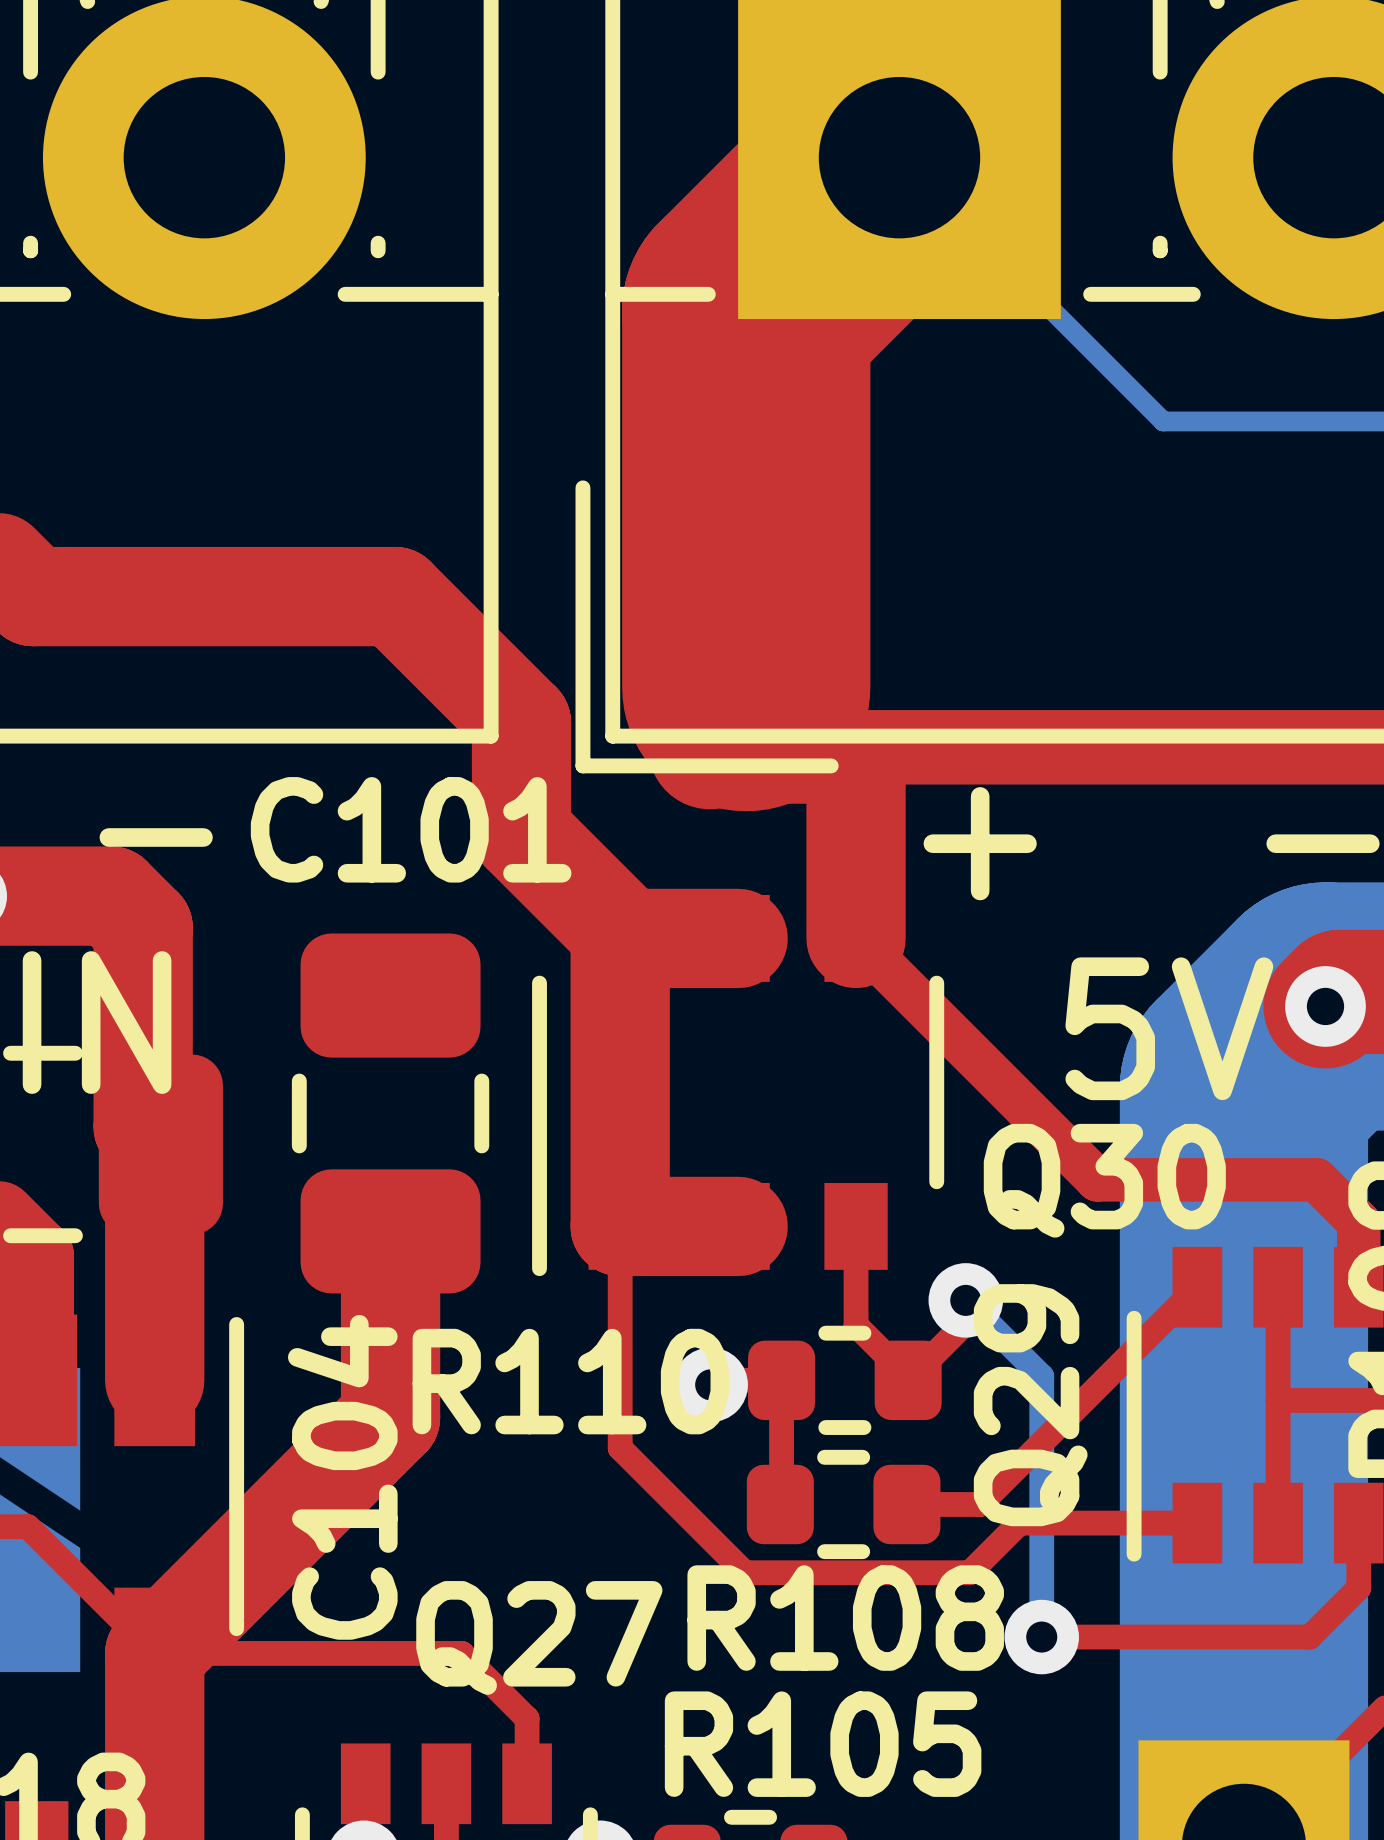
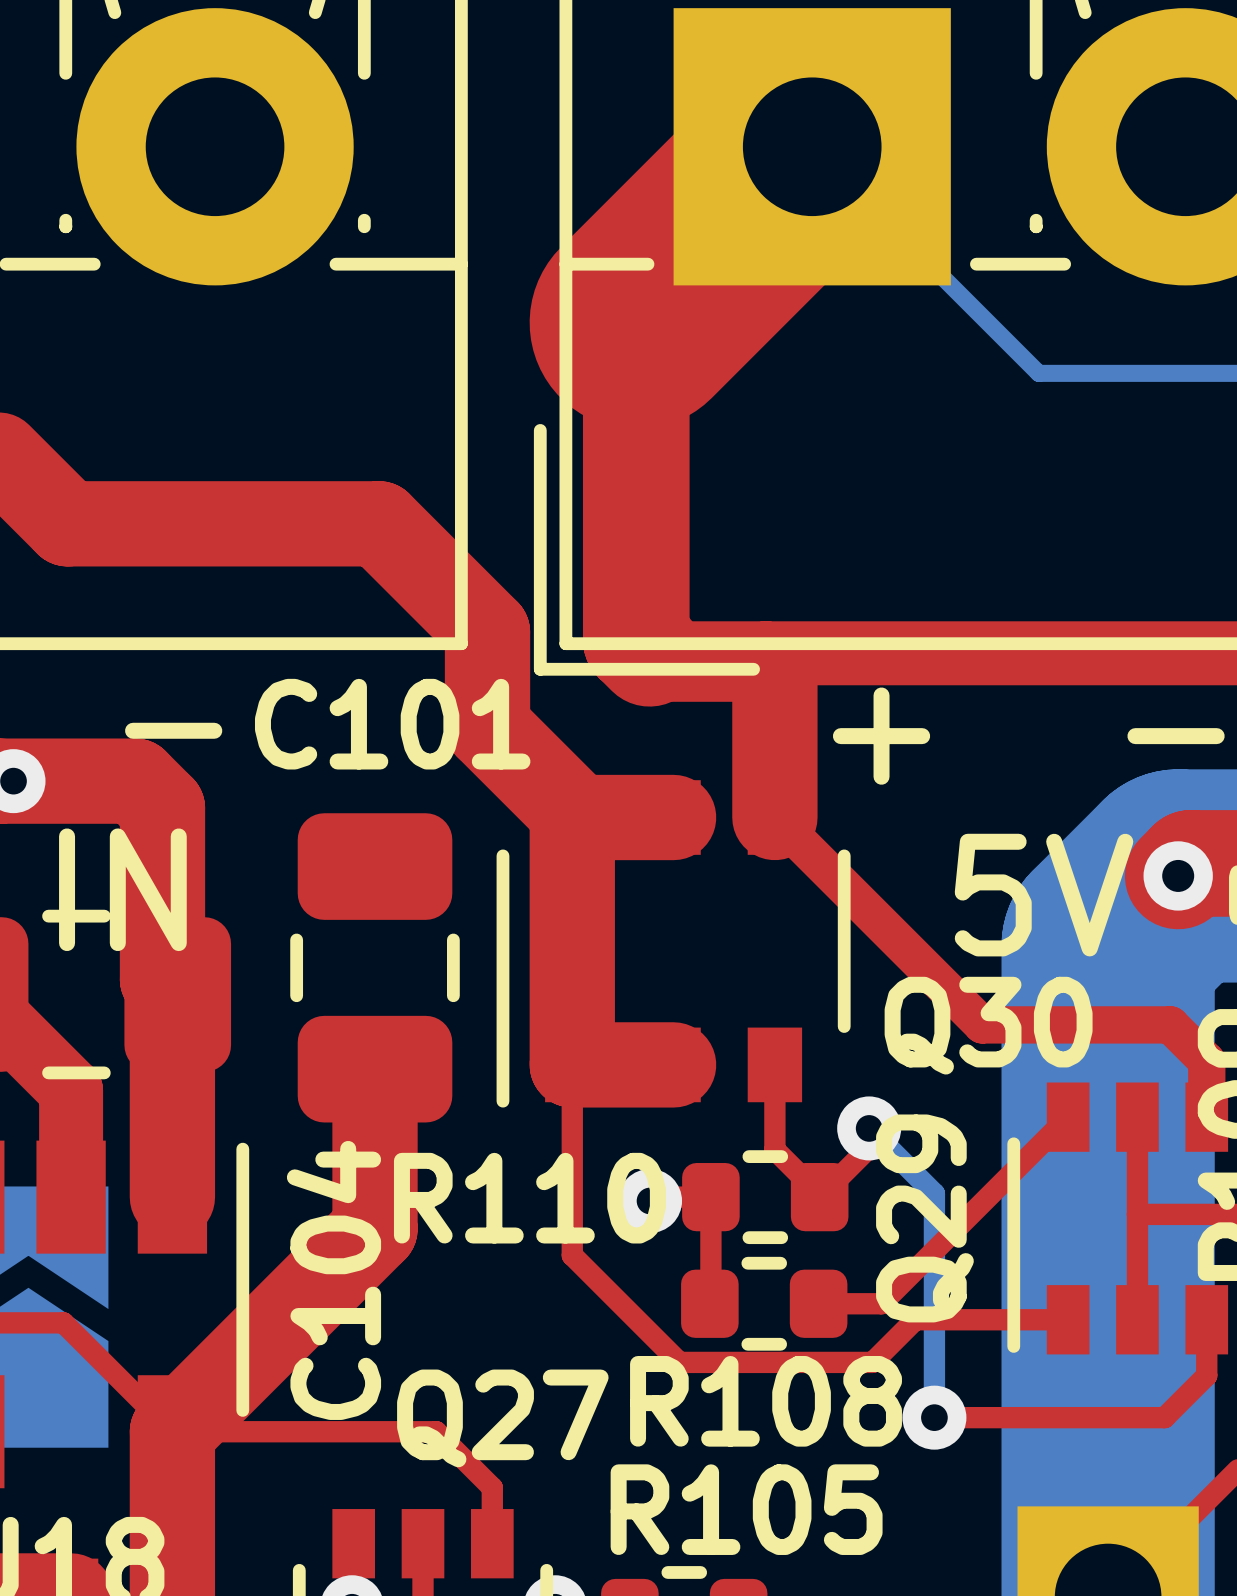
top track: (746, 310) (746, 687) (710, 723) (710, 747) -> (680, 278) (636, 322) (636, 639) (649, 653)

